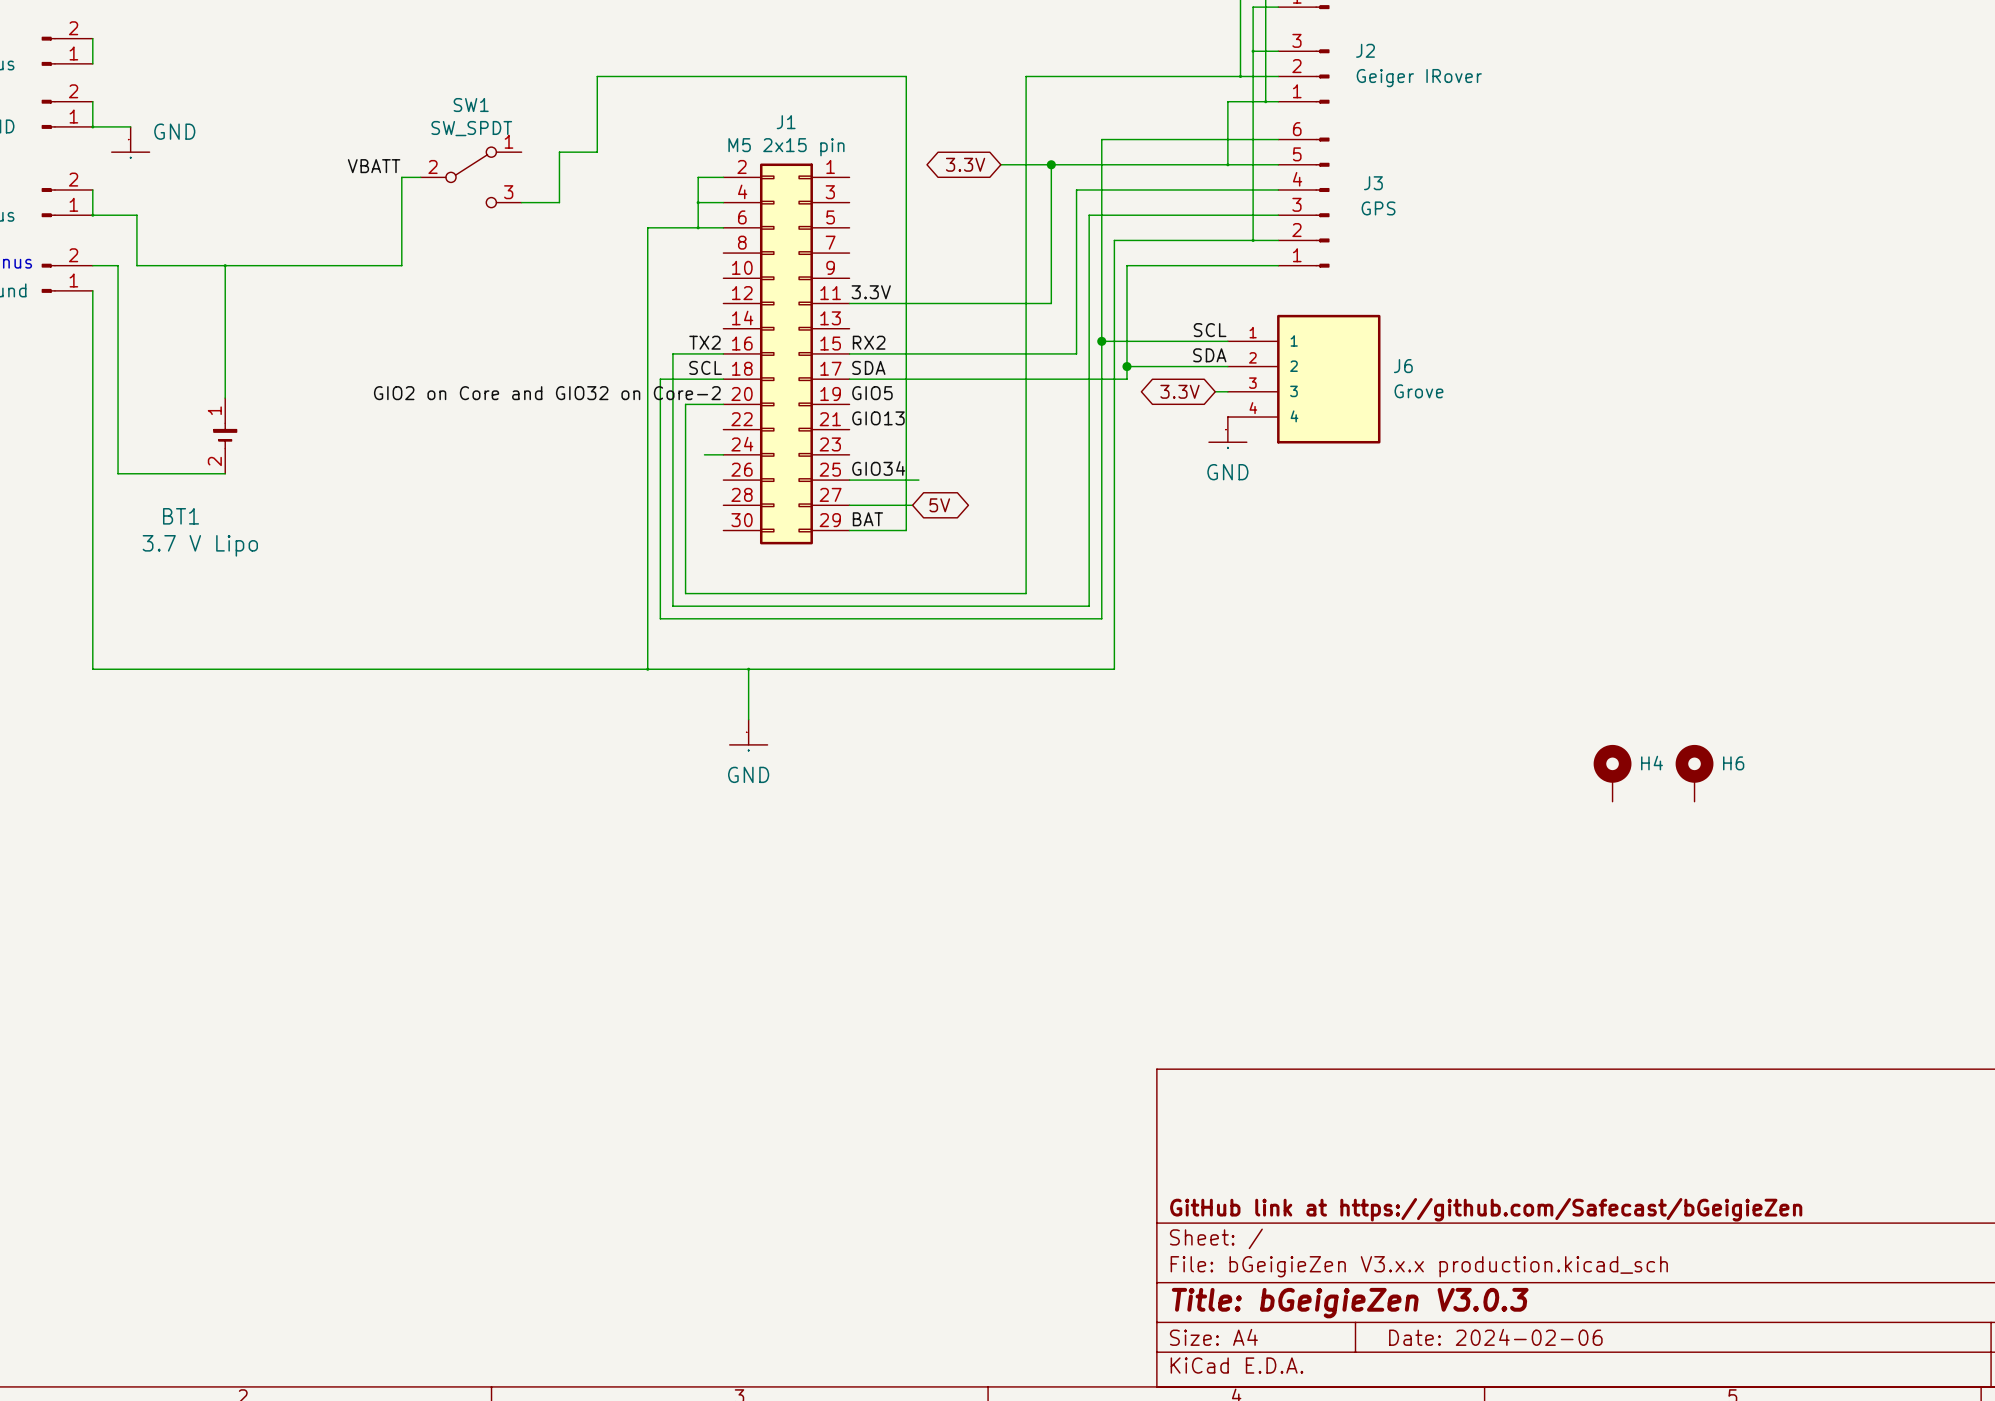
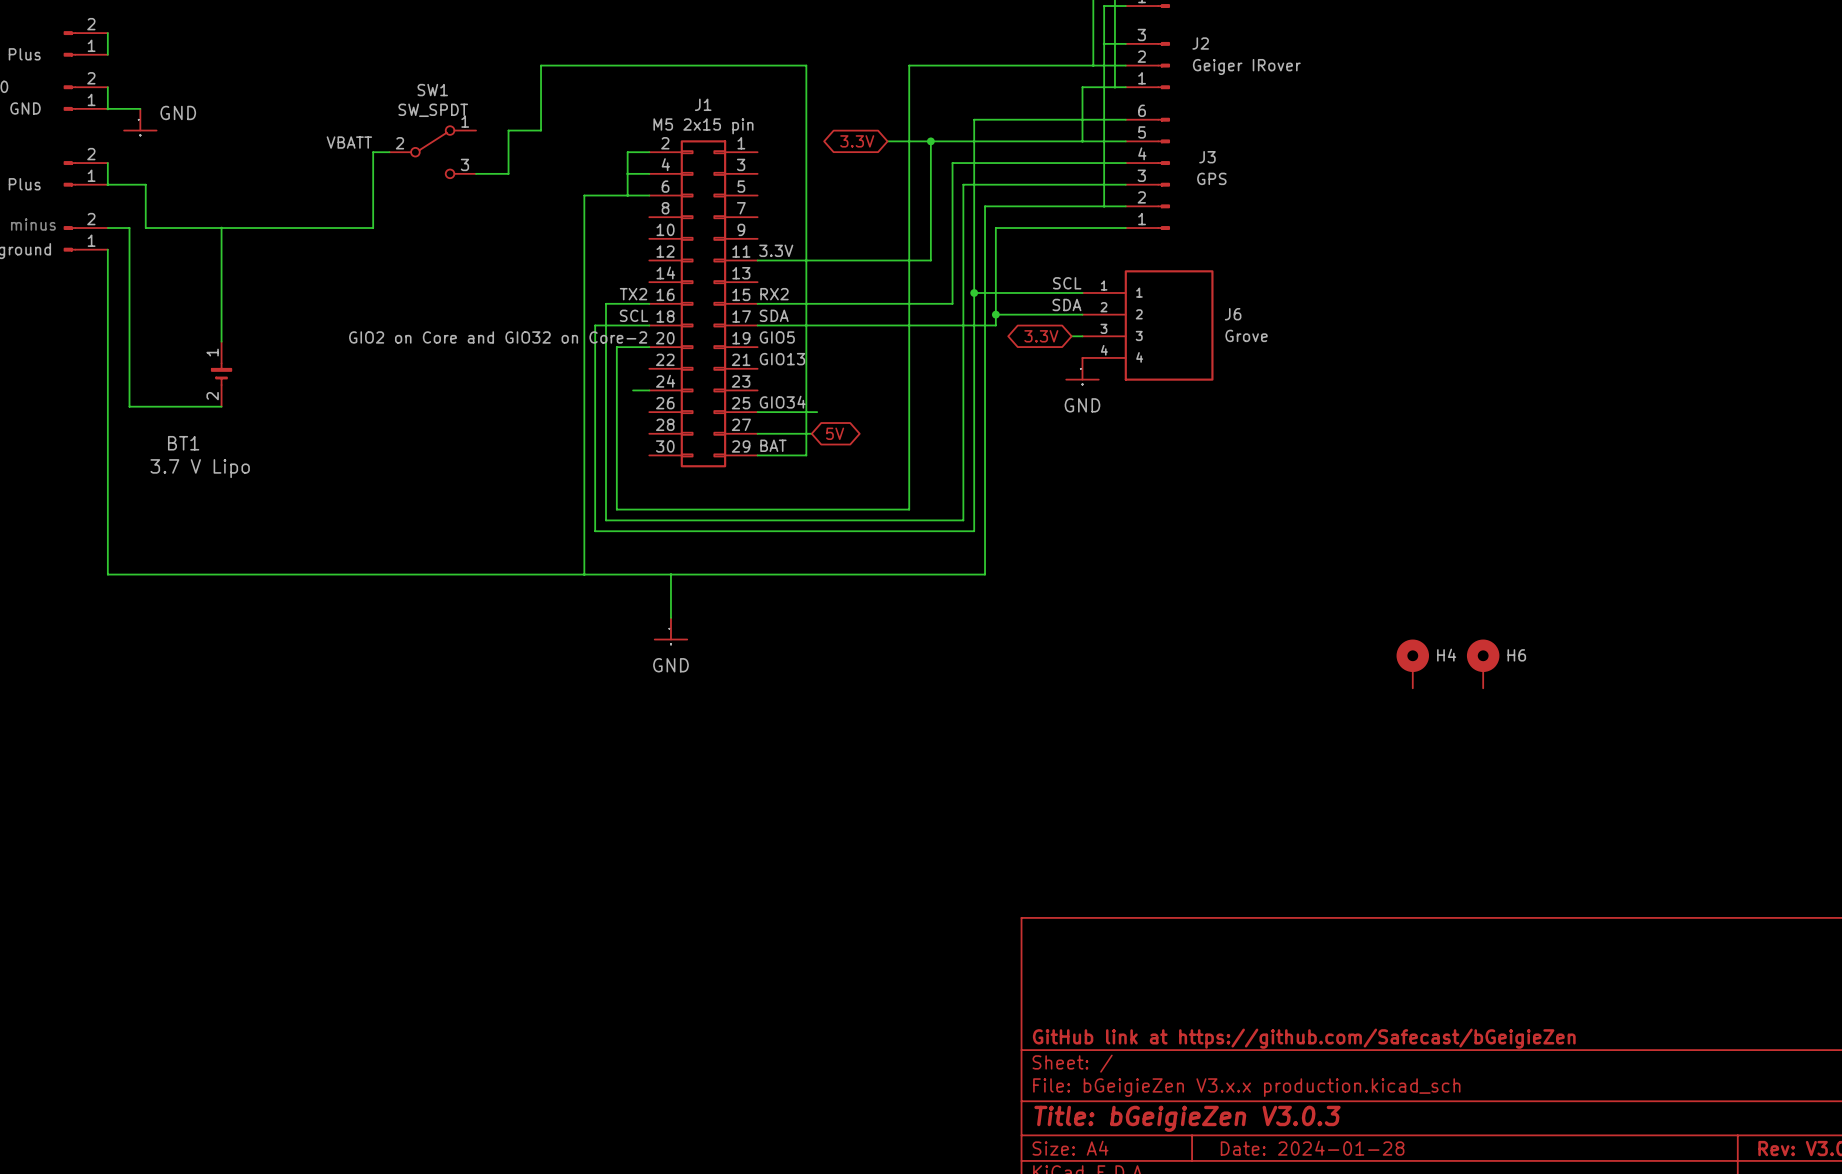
title block: Date: 2024-02-06 (1495, 1337) -> Date: 2024-01-28 (1312, 1148)

